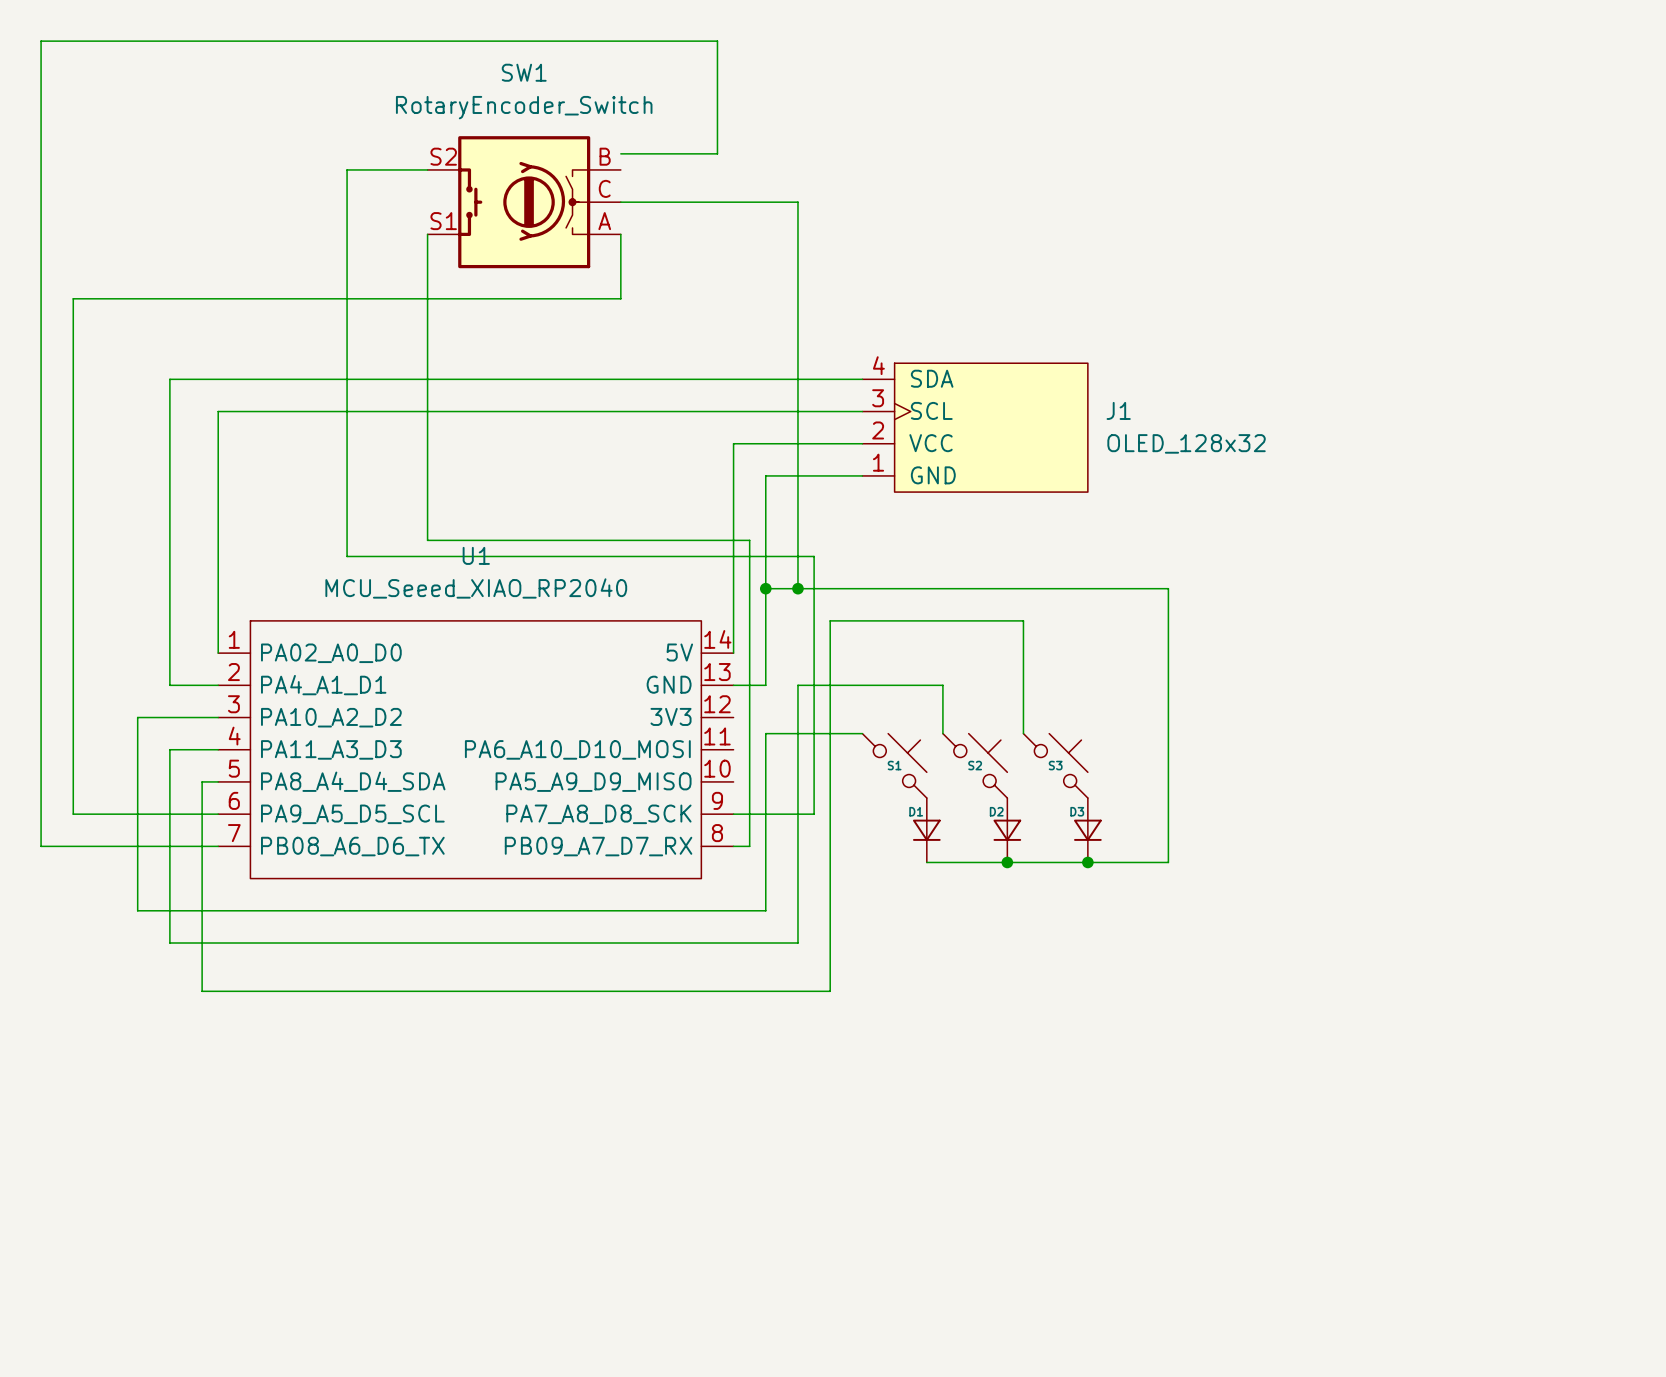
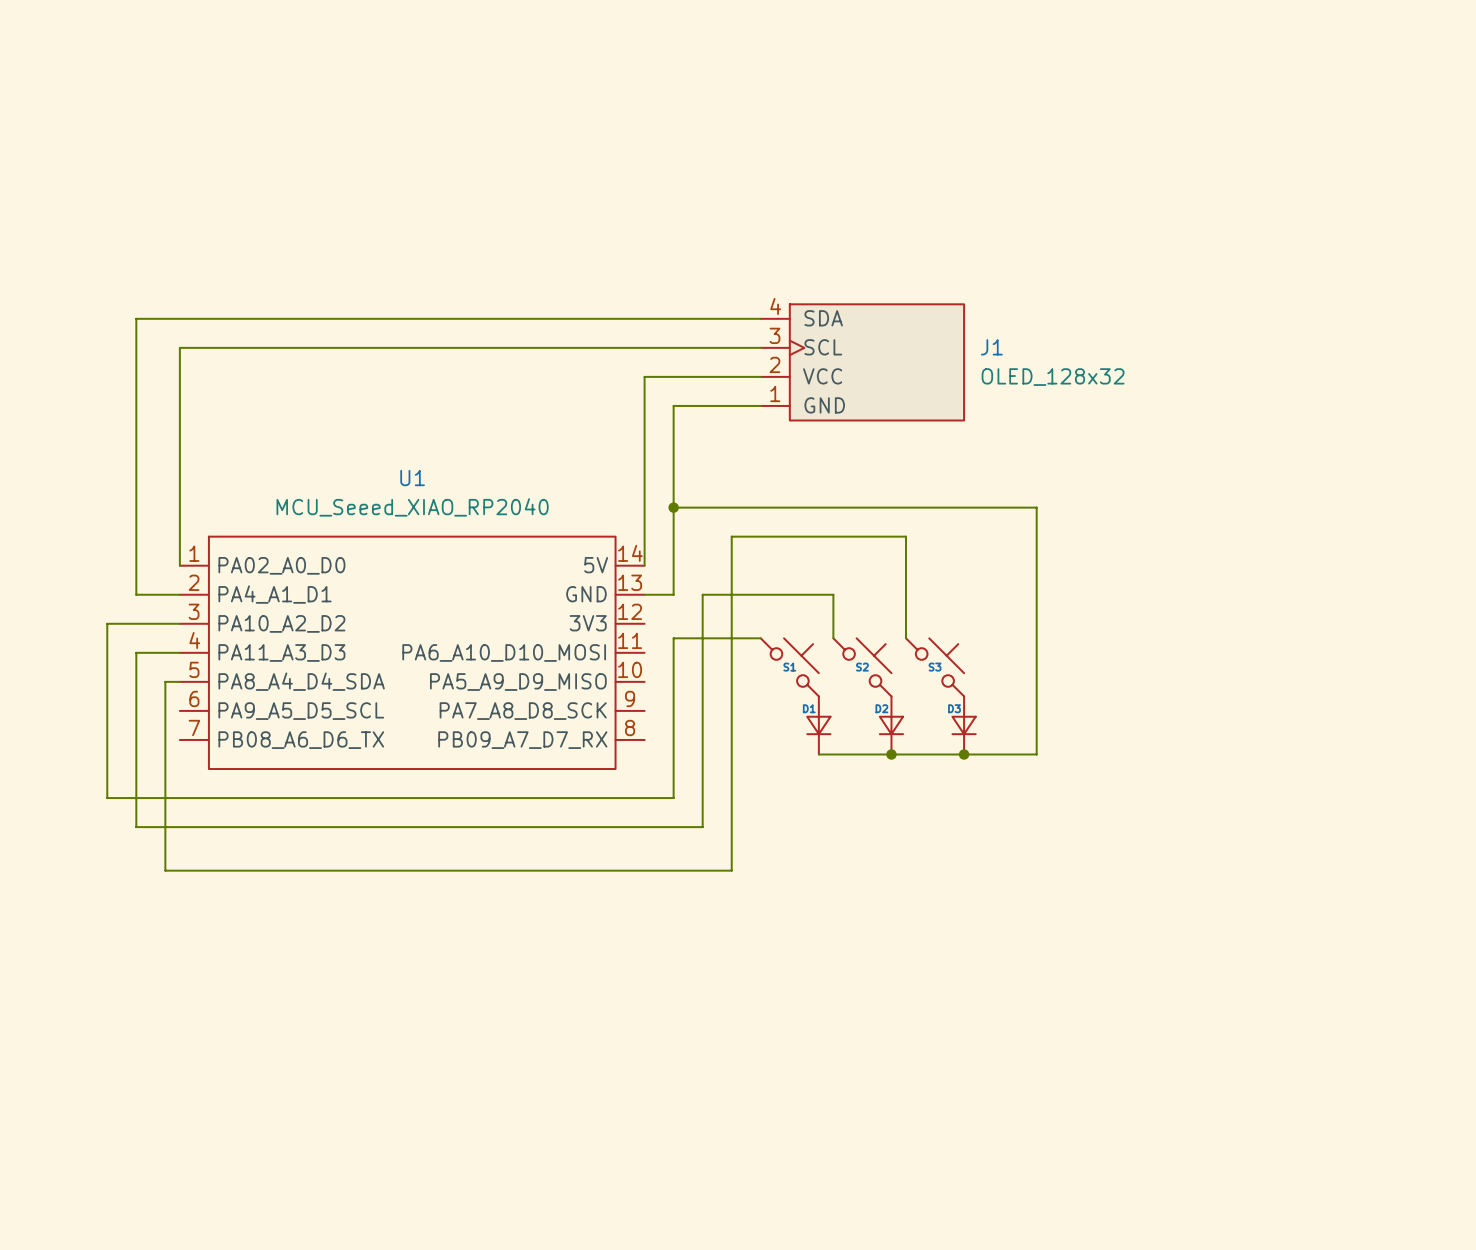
wire: (620, 153) (717, 153) (717, 41) (41, 41) (41, 846) (218, 846) -> none
wire: (427, 169) (347, 169) (347, 556) (814, 556) (814, 814) (733, 814) -> none
SW1: RotaryEncoder_Switch (524, 202) -> none
wire: (620, 202) (797, 202) (797, 588) -> none
wire: (427, 234) (427, 540) (749, 540) (749, 846) (733, 846) -> none
wire: (620, 234) (620, 298) (73, 298) (73, 814) (218, 814) -> none
junction: (797, 588) -> none

